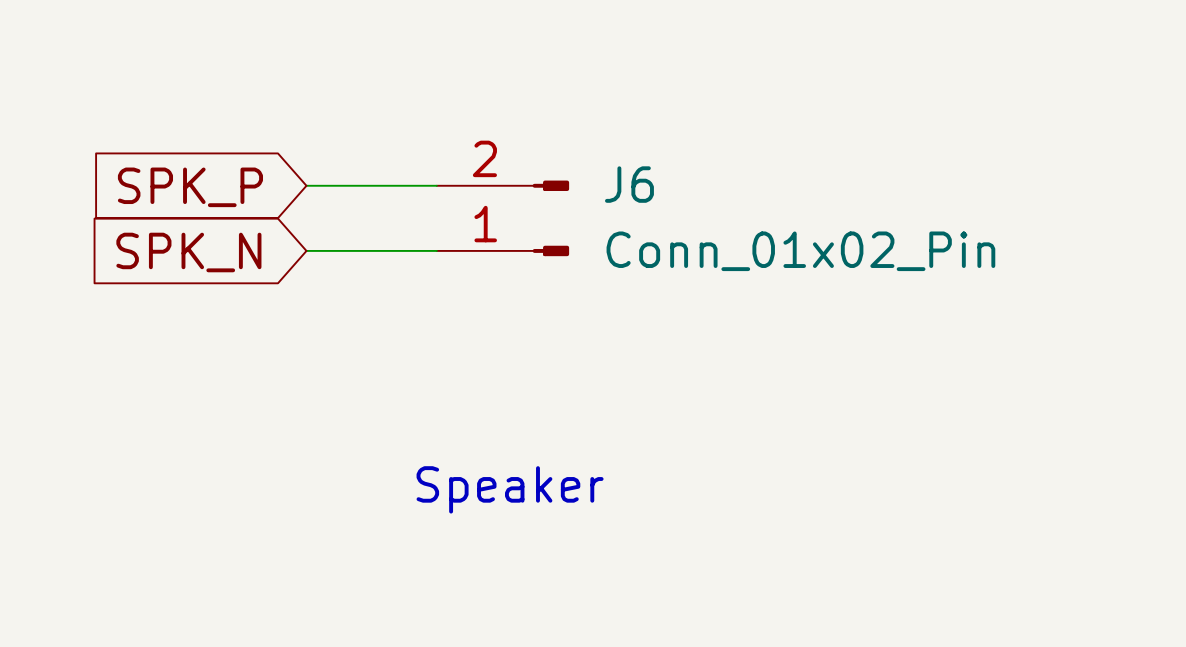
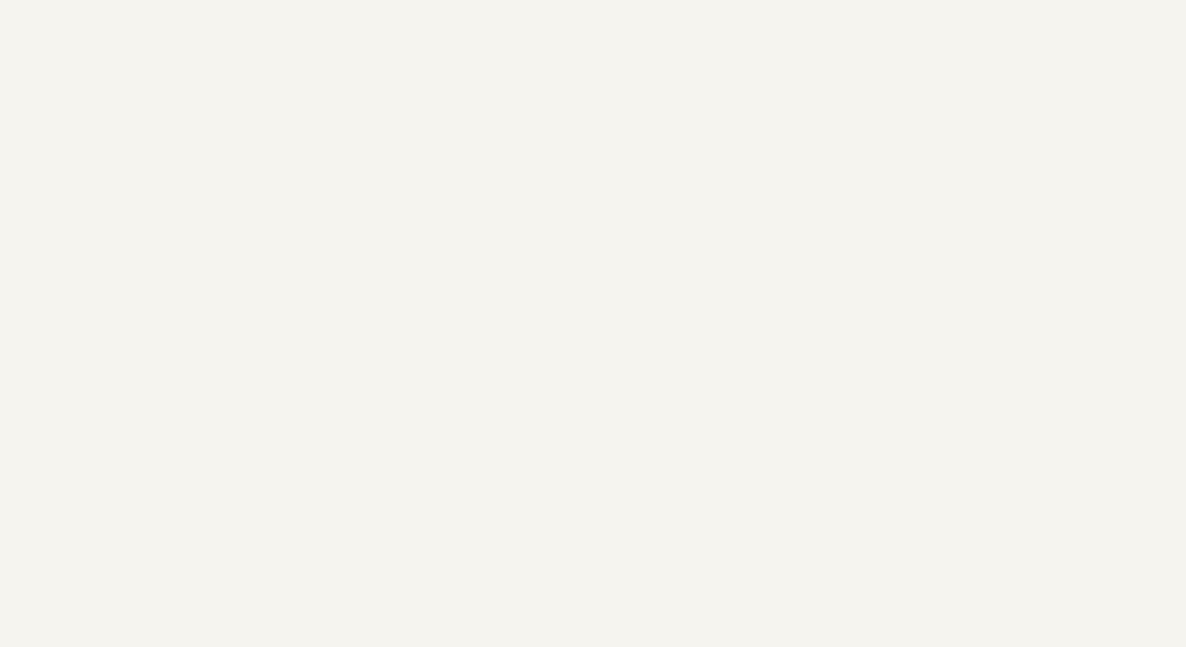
wire: (306, 185) (436, 185) -> none
global label: SPK_P (190, 187) -> none
J6: Conn_01x02_Pin (502, 218) -> none
wire: (306, 250) (436, 250) -> none
global label: SPK_N (188, 252) -> none
text: Speaker (510, 489) -> none

